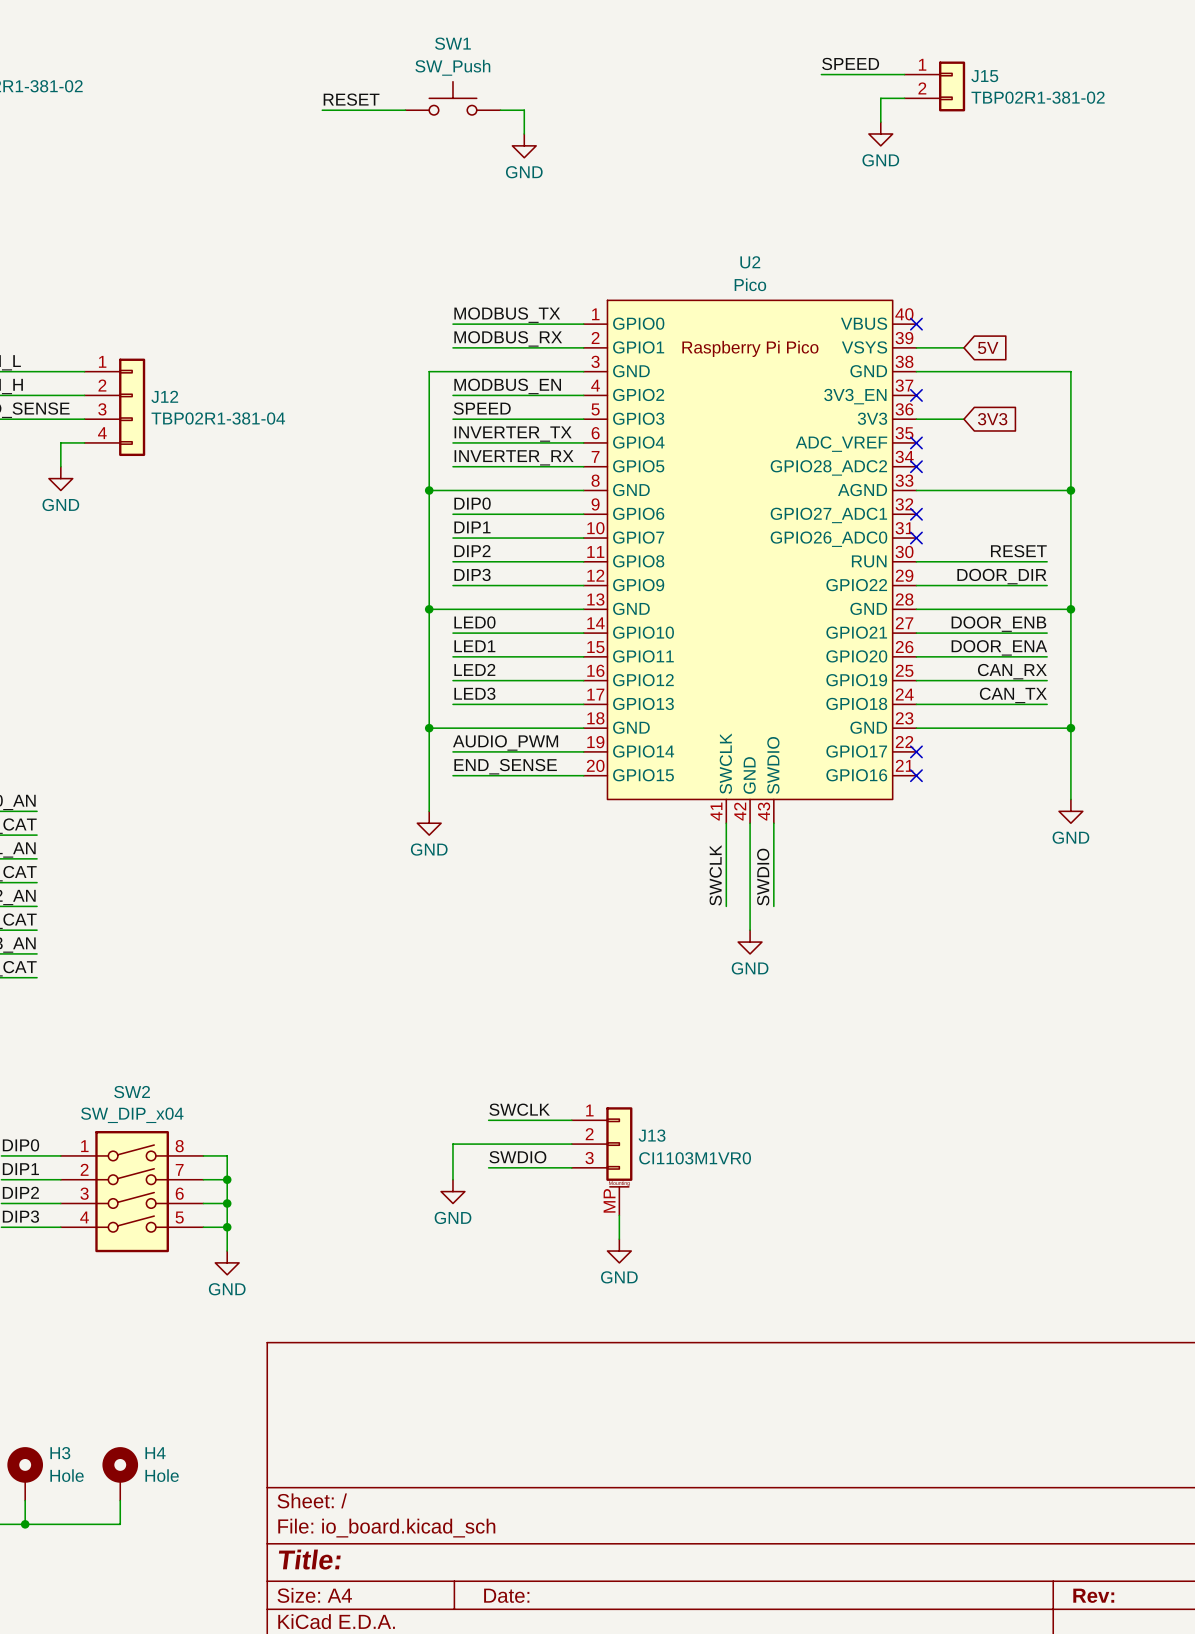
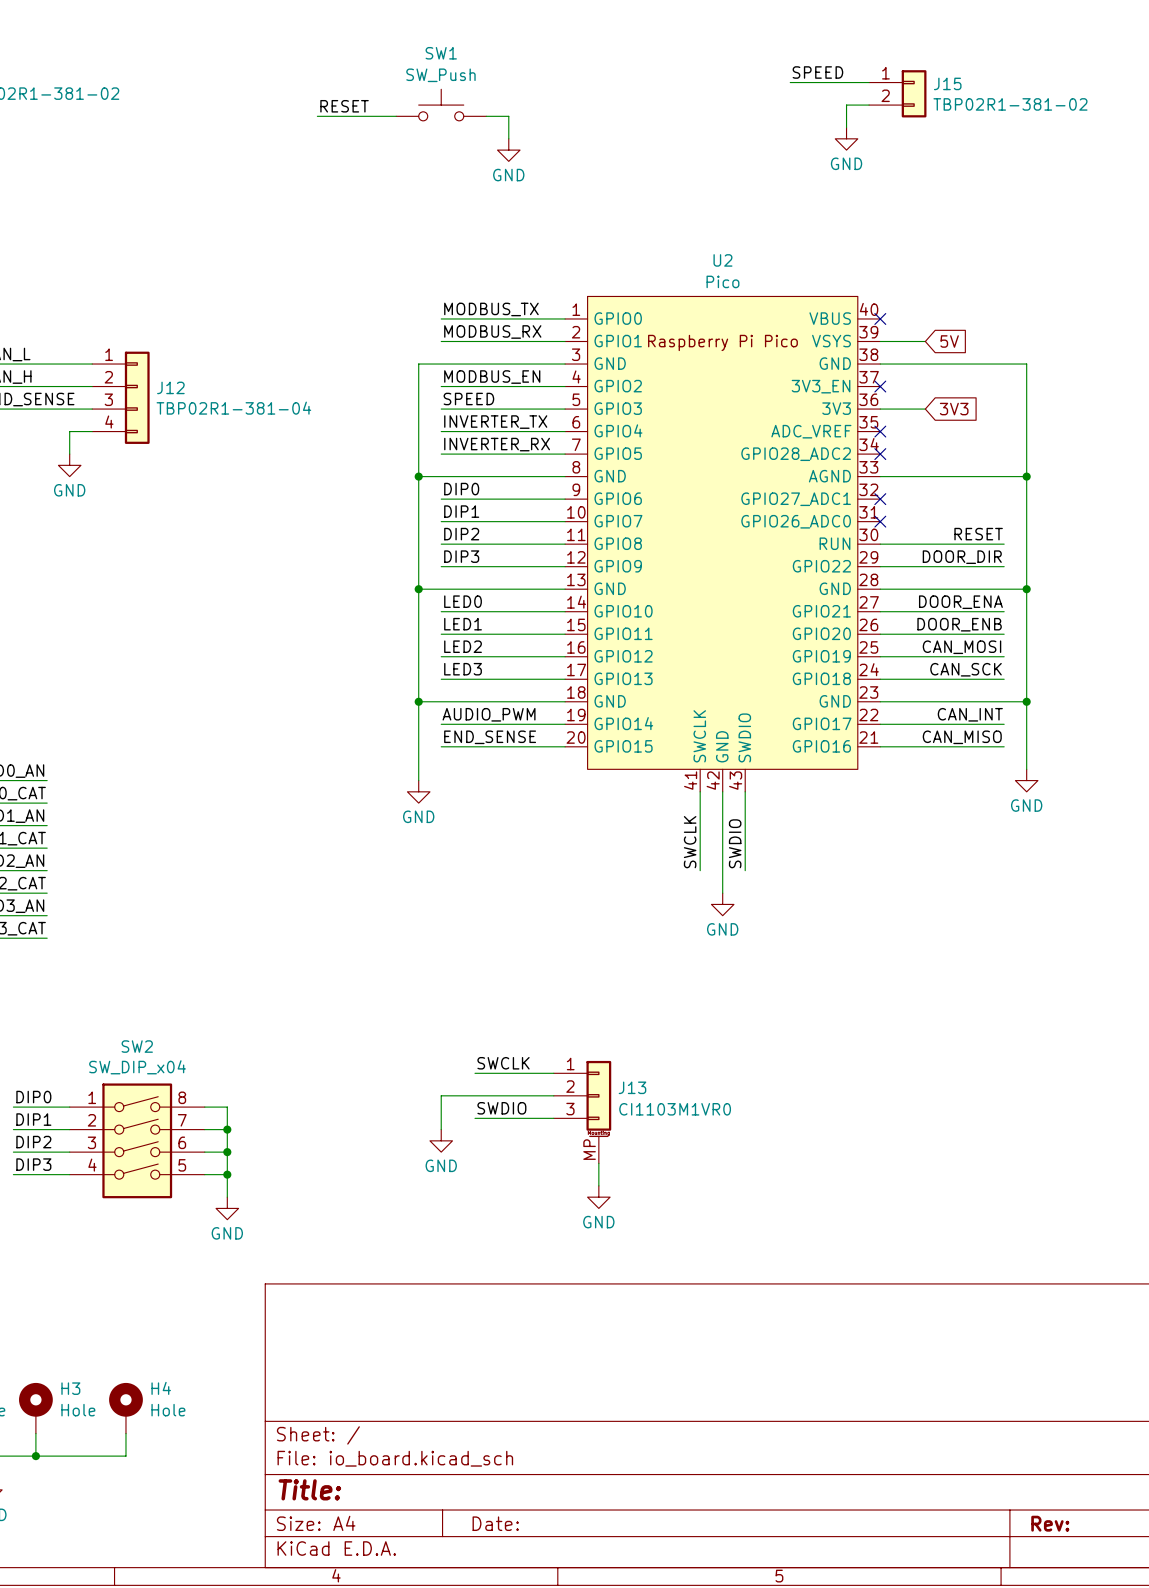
label: DOOR_ENB (998, 624) -> DOOR_ENA (960, 602)
label: DOOR_ENA (999, 647) -> DOOR_ENB (959, 624)
label: CAN_RX (1012, 671) -> CAN_MOSI (961, 647)
label: CAN_TX (1013, 695) -> CAN_SCK (966, 669)
label: none -> CAN_INT (970, 714)
wire: none -> (880, 724) (1004, 724)
no-connect mark: (916, 751) -> none
label: none -> CAN_MISO (962, 737)
wire: none -> (880, 746) (1004, 746)
no-connect mark: (916, 775) -> none

